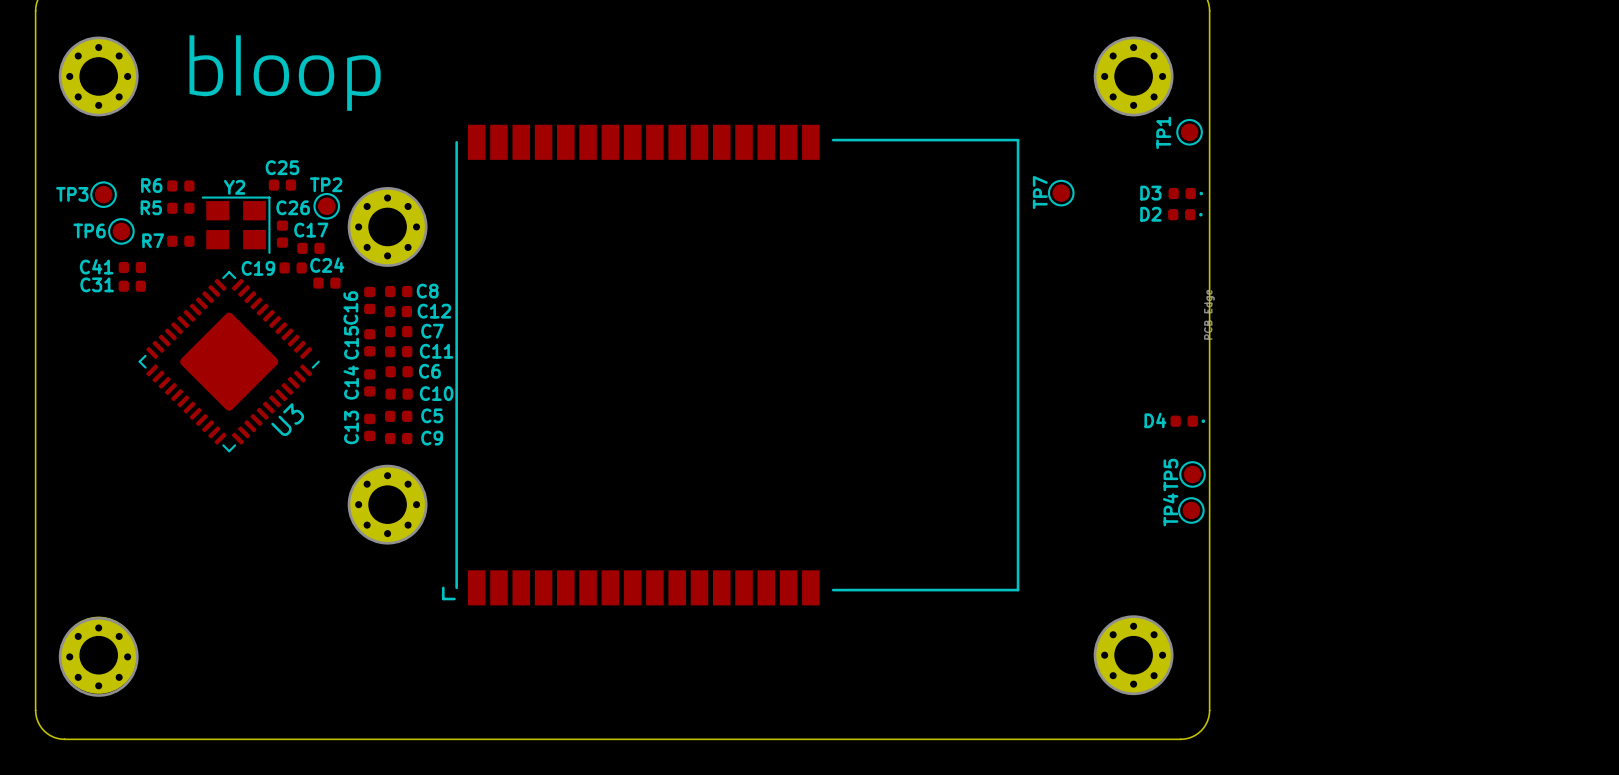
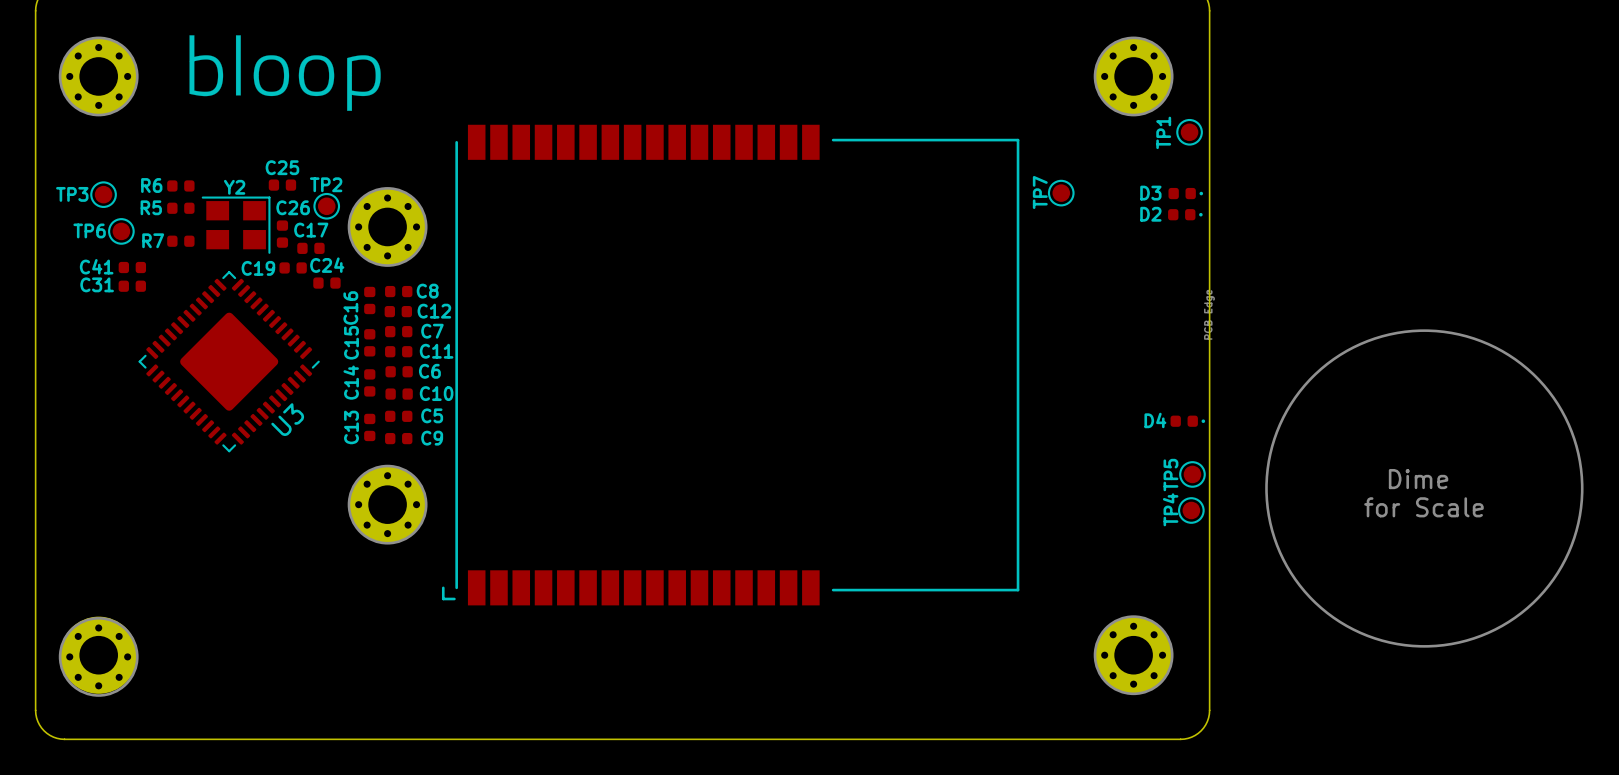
drawing: none -> [1265, 329, 1584, 648]
text: none -> Dime (1418, 479)
text: none -> for Scale (1423, 507)

